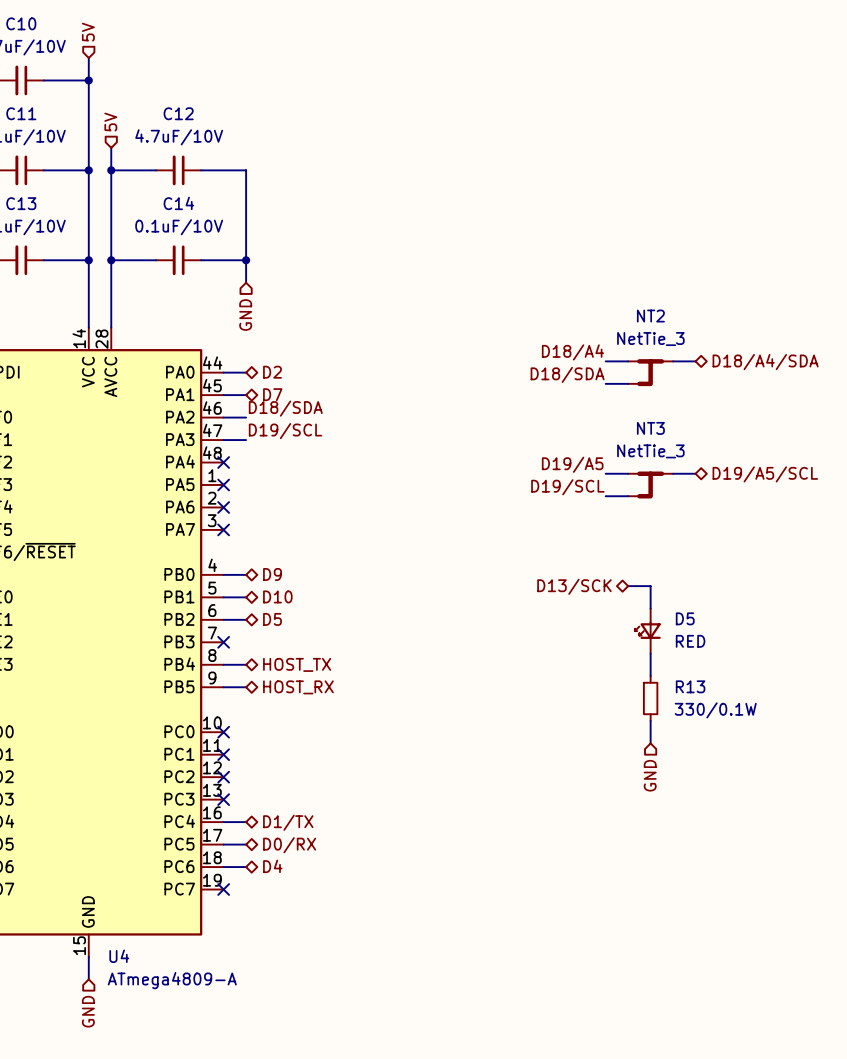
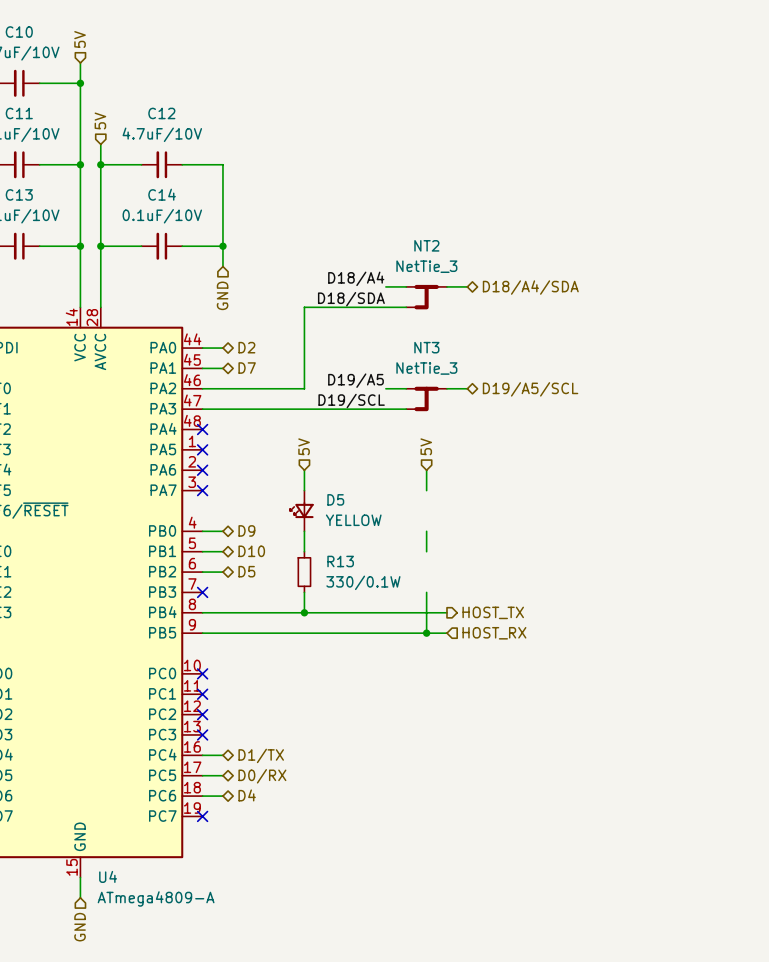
label: none -> D18/SDA (351, 299)
wire: none -> (406, 307) (304, 307) (304, 388) (222, 388)
label position: D18/A4 (572, 352) -> D18/A4 (356, 278)
wire: (605, 361) (628, 361) -> (385, 286) (406, 286)
wire: (673, 361) (695, 361) -> (446, 286) (467, 286)
hierarchical label position: D18/A4/SDA (765, 362) -> D18/A4/SDA (530, 287)
NT2 position: (650, 372) -> (426, 297)
label: D18/SDA (567, 374) -> none
wire: (605, 383) (628, 383) -> none
label: D18/SDA (285, 408) -> none
label: D19/SCL (285, 431) -> none
label: none -> D19/SCL (351, 401)
wire: none -> (222, 409) (406, 409)
label position: D19/A5 (572, 464) -> D19/A5 (356, 380)
wire: (605, 473) (628, 473) -> (385, 388) (406, 388)
wire: (673, 473) (695, 473) -> (446, 388) (467, 388)
hierarchical label position: D19/A5/SCL (765, 474) -> D19/A5/SCL (530, 389)
hierarchical label: none -> 5V (304, 446)
hierarchical label: none -> 5V (426, 446)
NT3 position: (650, 484) -> (426, 398)
label: D19/SCL (567, 487) -> none
wire: (605, 496) (628, 496) -> none
wire: none -> (304, 470) (304, 490)
wire: none -> (426, 470) (426, 490)
wire: none -> (304, 531) (304, 551)
hierarchical label: D13/SCK (574, 586) -> none
wire: (628, 586) (650, 586) (650, 608) -> none
D5 position: (647, 631) -> (301, 510)
D5 value: RED (690, 641) -> YELLOW (353, 520)
wire: none -> (304, 592) (304, 612)
wire: none -> (426, 592) (426, 633)
wire: (650, 653) (650, 676) -> (426, 531) (426, 551)
wire: none -> (222, 612) (446, 612)
hierarchical label: HOST_TX (297, 664) -> none
junction: none -> (304, 612)
hierarchical label: none -> HOST_TX (493, 612)
wire: none -> (222, 633) (446, 633)
hierarchical label: HOST_RX (298, 687) -> none
junction: none -> (426, 633)
hierarchical label: none -> HOST_RX (494, 633)
R13 position: (650, 698) -> (304, 572)
wire: (650, 720) (650, 743) -> none
hierarchical label: GND (650, 775) -> none

